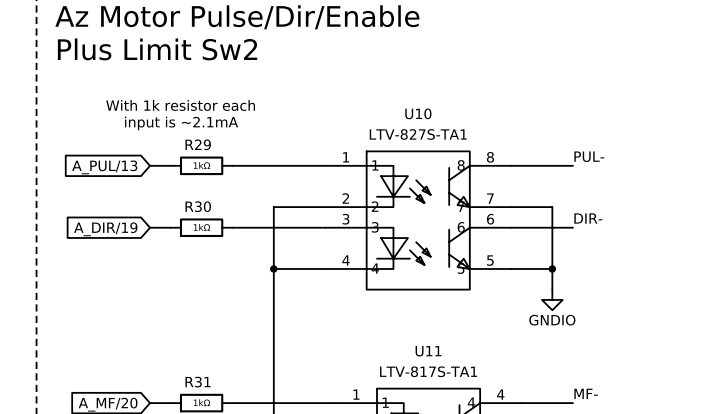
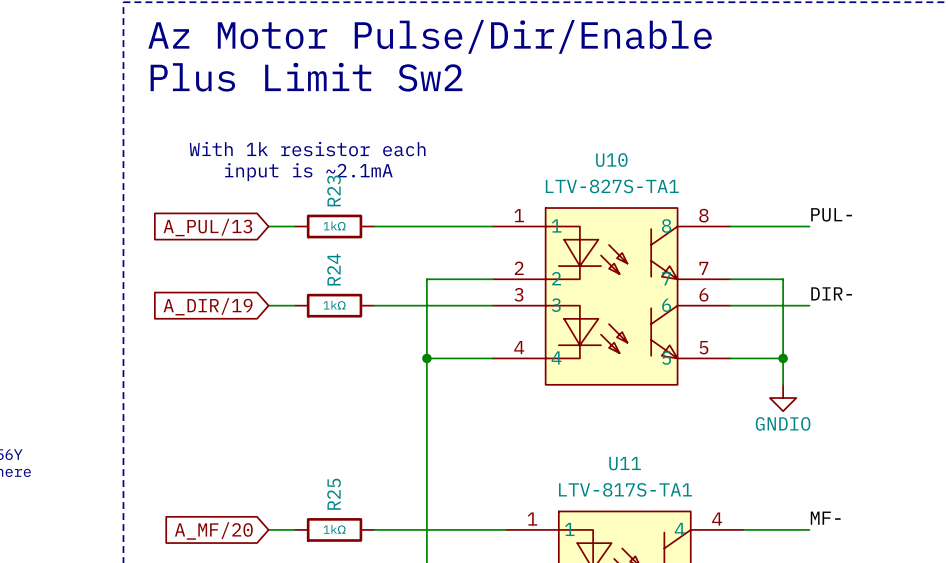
R29 name: R29 (198, 144) -> R23 (334, 190)
R30 name: R30 (198, 206) -> R24 (333, 269)
R31 name: R31 (198, 382) -> R25 (334, 494)

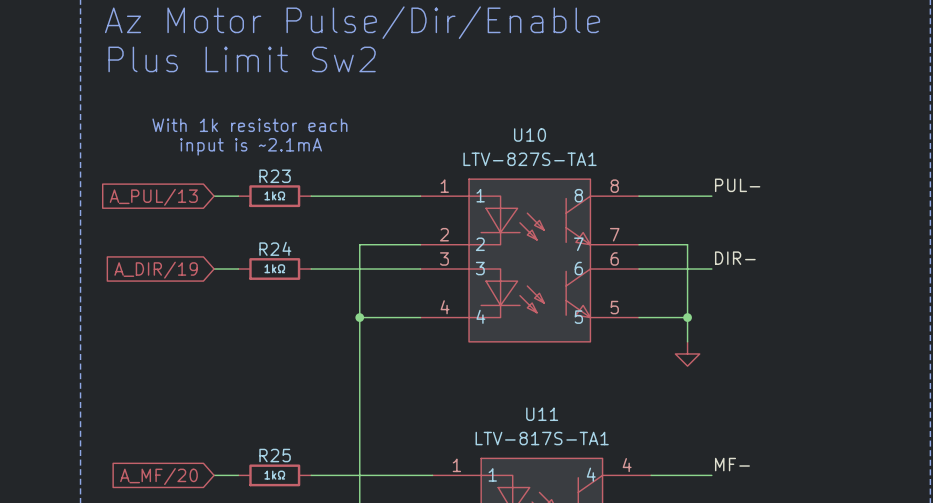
R23 name rotation: 0° (334, 190) -> 90° clockwise (275, 176)
R24 name rotation: 0° (333, 269) -> 90° clockwise (275, 248)
power symbol text: GNDIO (783, 423) -> none
R25 name rotation: 0° (334, 494) -> 90° clockwise (275, 455)

